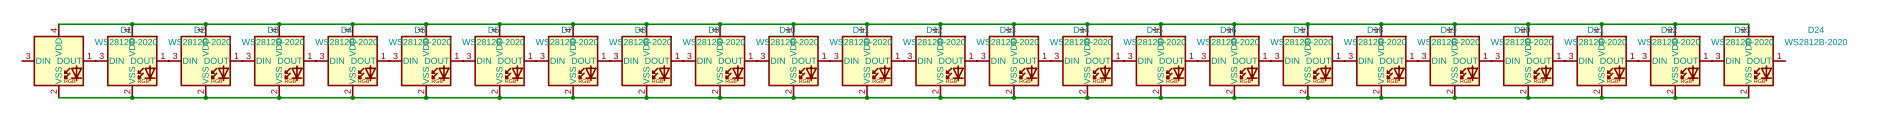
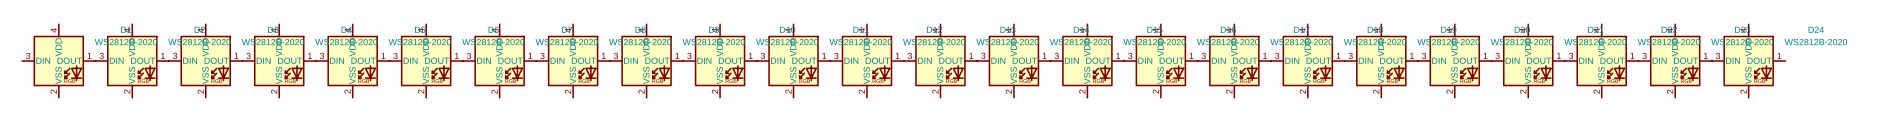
wire: (58, 24) (1748, 24) -> none
junction: (132, 24) -> none
junction: (205, 24) -> none
junction: (279, 24) -> none
junction: (352, 24) -> none
junction: (426, 24) -> none
junction: (499, 24) -> none
junction: (573, 24) -> none
junction: (646, 24) -> none
junction: (720, 24) -> none
junction: (793, 24) -> none
junction: (866, 24) -> none
junction: (940, 24) -> none
junction: (1013, 24) -> none
junction: (1087, 24) -> none
junction: (1160, 24) -> none
junction: (1234, 24) -> none
junction: (1307, 24) -> none
junction: (1381, 24) -> none
junction: (1454, 24) -> none
junction: (1528, 24) -> none
junction: (1601, 24) -> none
junction: (1675, 24) -> none
wire: (58, 97) (1748, 97) -> none
junction: (132, 97) -> none
junction: (205, 97) -> none
junction: (279, 97) -> none
junction: (352, 97) -> none
junction: (426, 97) -> none
junction: (499, 97) -> none
junction: (573, 97) -> none
junction: (646, 97) -> none
junction: (720, 97) -> none
junction: (793, 97) -> none
junction: (866, 97) -> none
junction: (940, 97) -> none
junction: (1013, 97) -> none
junction: (1087, 97) -> none
junction: (1160, 97) -> none
junction: (1234, 97) -> none
junction: (1307, 97) -> none
junction: (1381, 97) -> none
junction: (1454, 97) -> none
junction: (1528, 97) -> none
junction: (1601, 97) -> none
junction: (1675, 97) -> none

